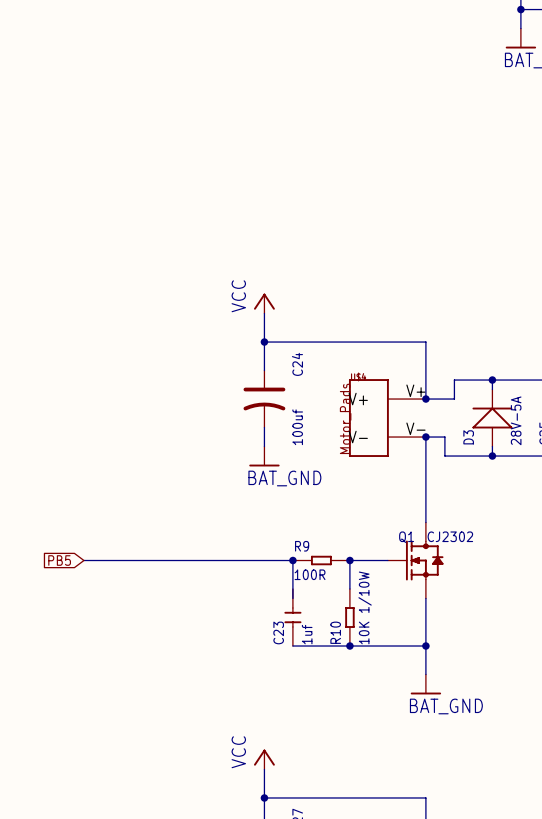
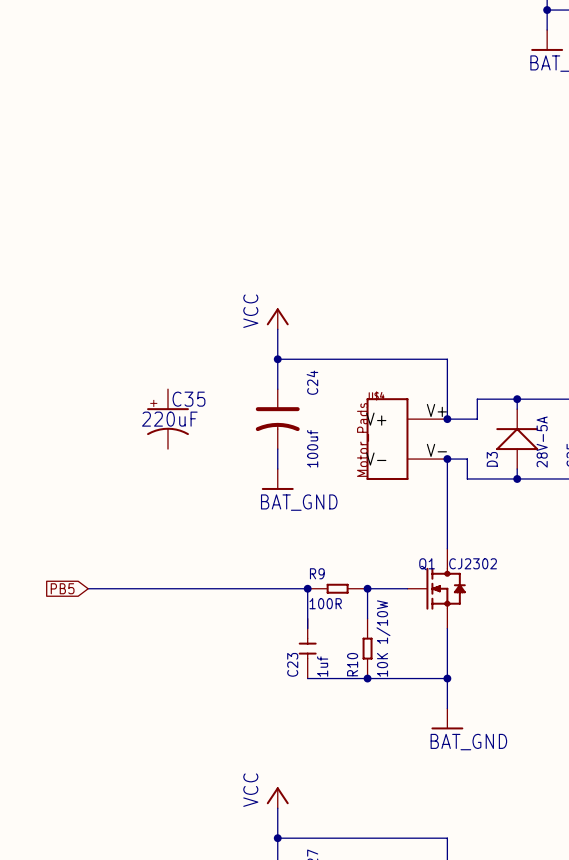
C35: none -> 220uF (167, 419)

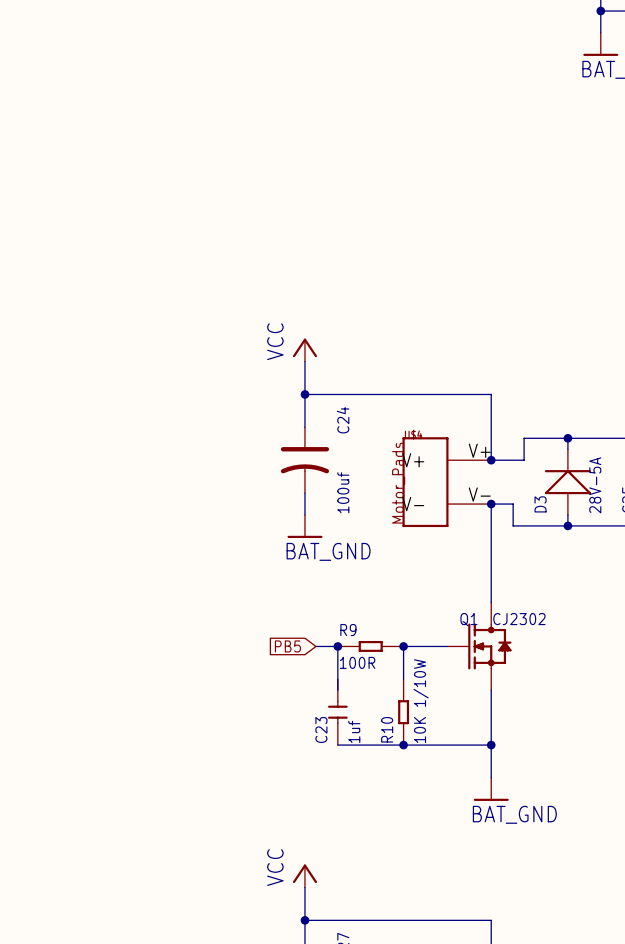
C35: 220uF (167, 419) -> none
global label: PB5 (62, 588) -> none
wire: (88, 588) (287, 588) -> none
global label: none -> PB5 (287, 646)

